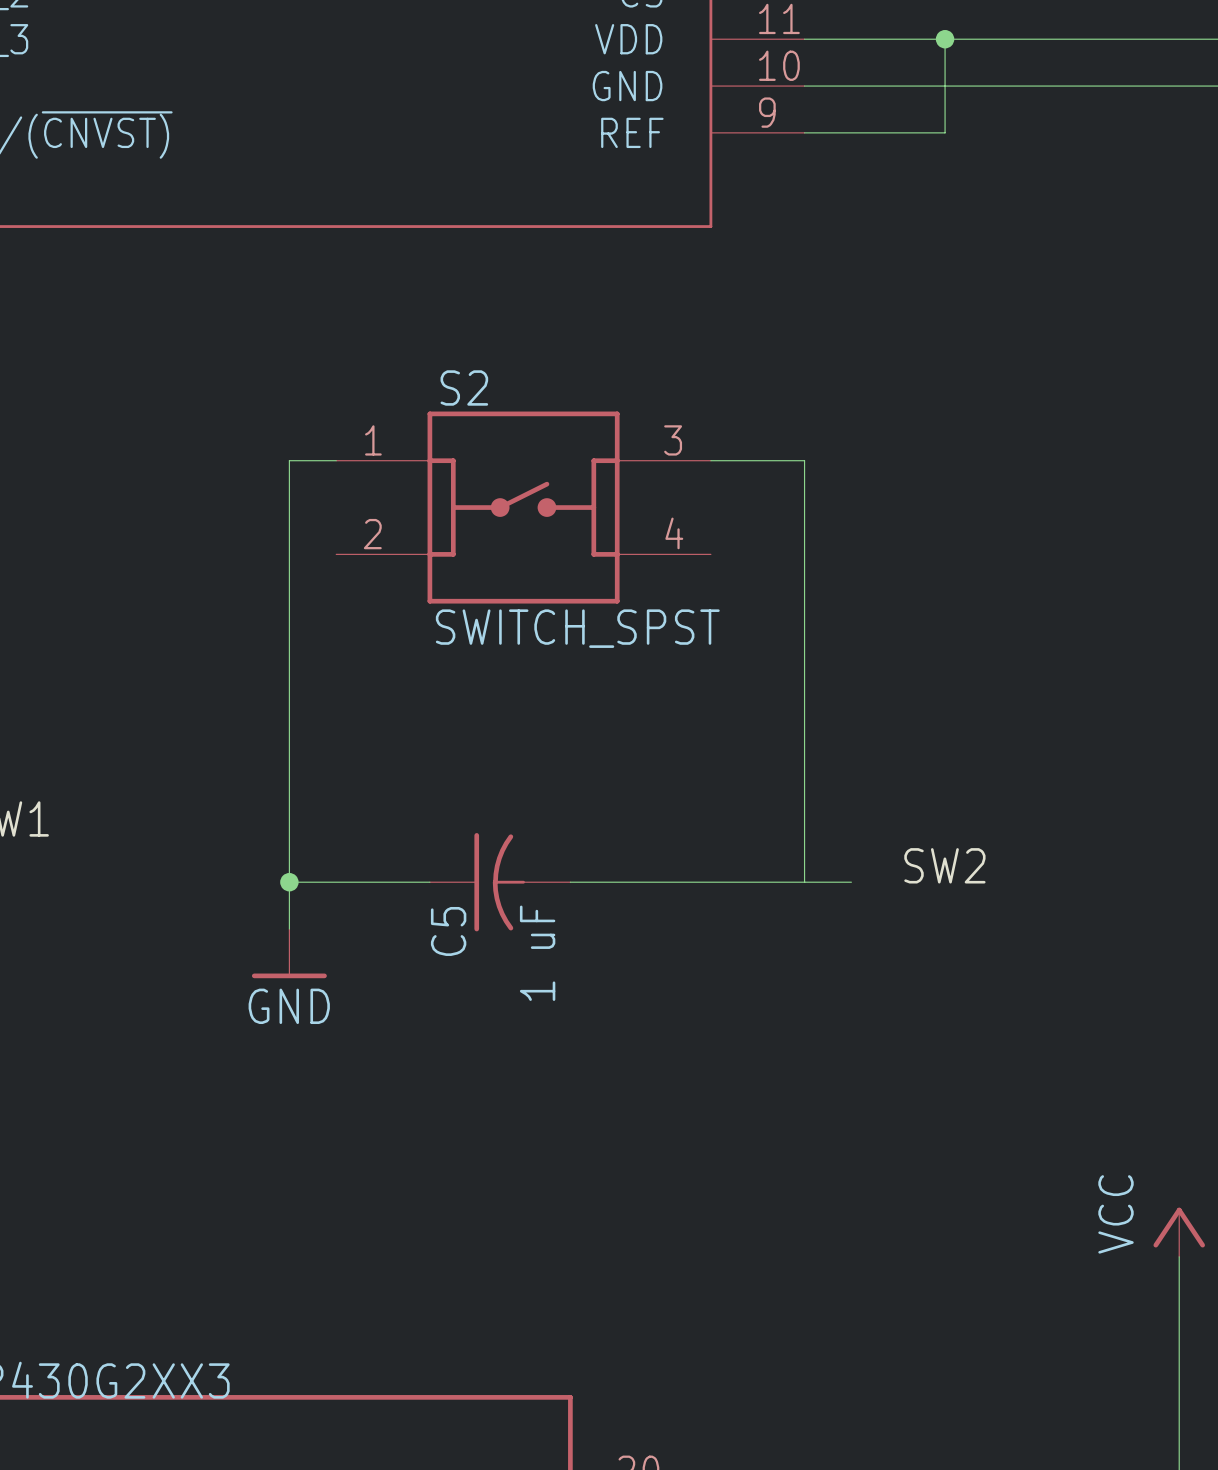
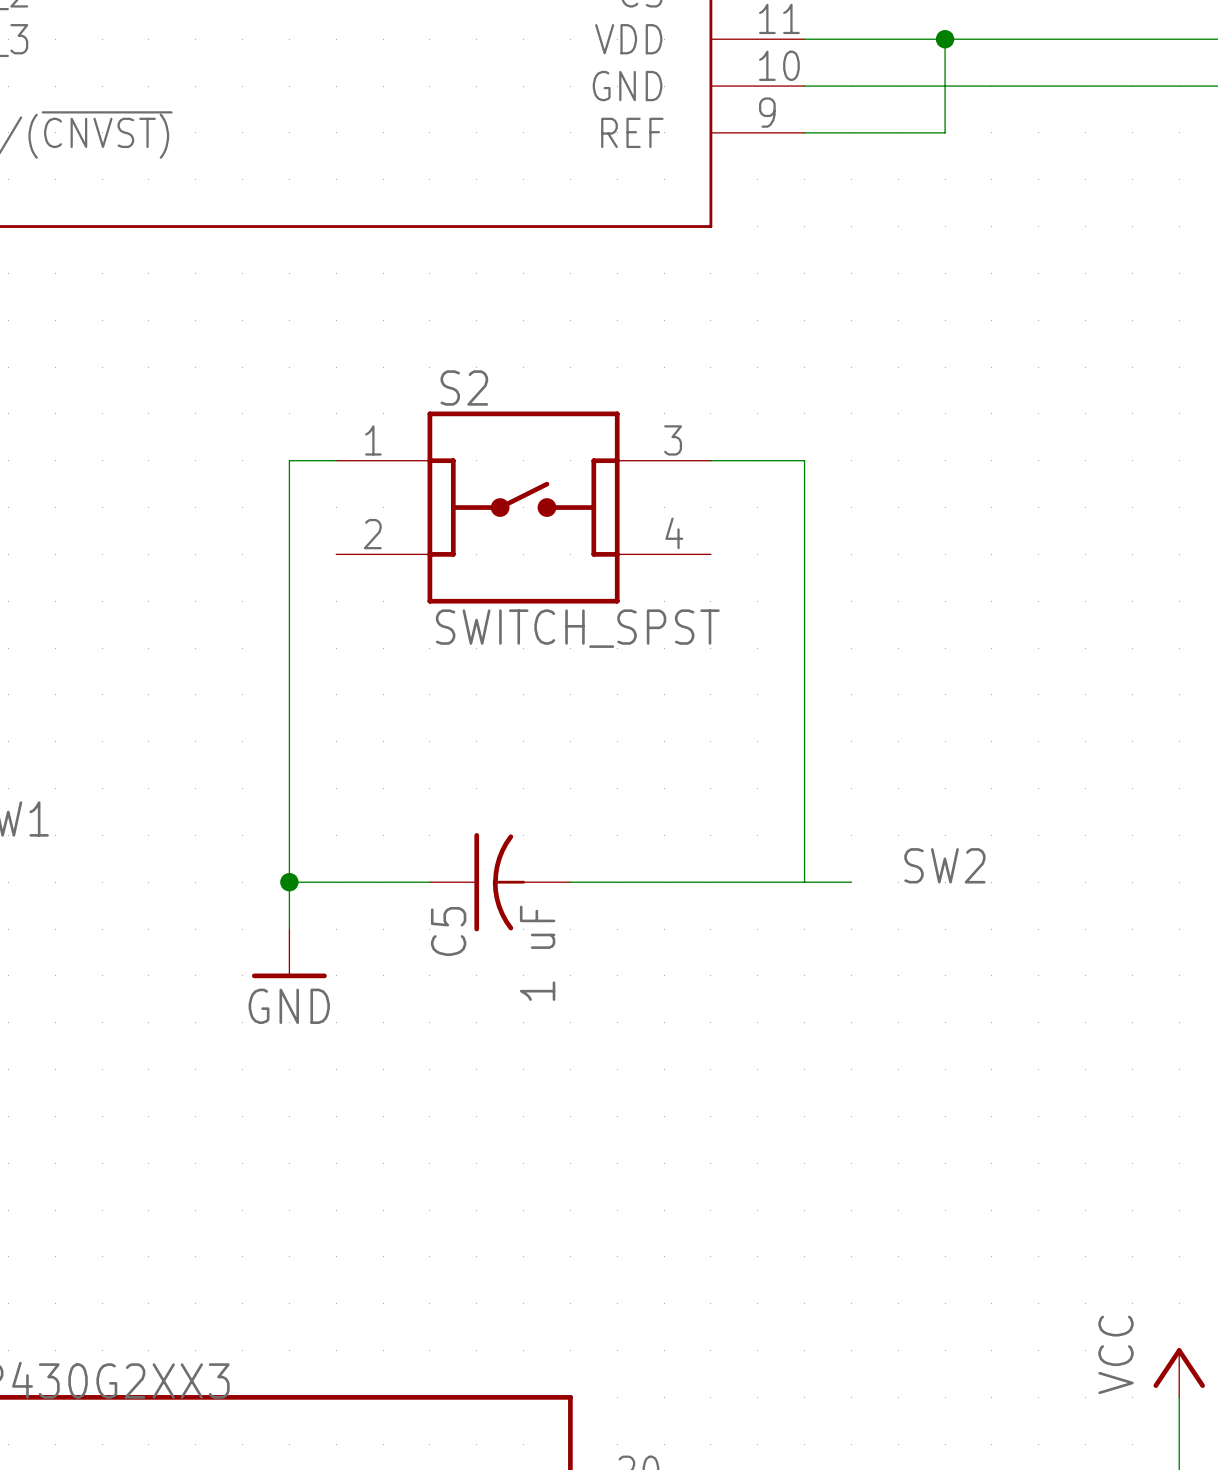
power symbol position: VCC (1179, 1232) -> VCC (1179, 1372)
wire: (1179, 1256) (1179, 1397) -> none

